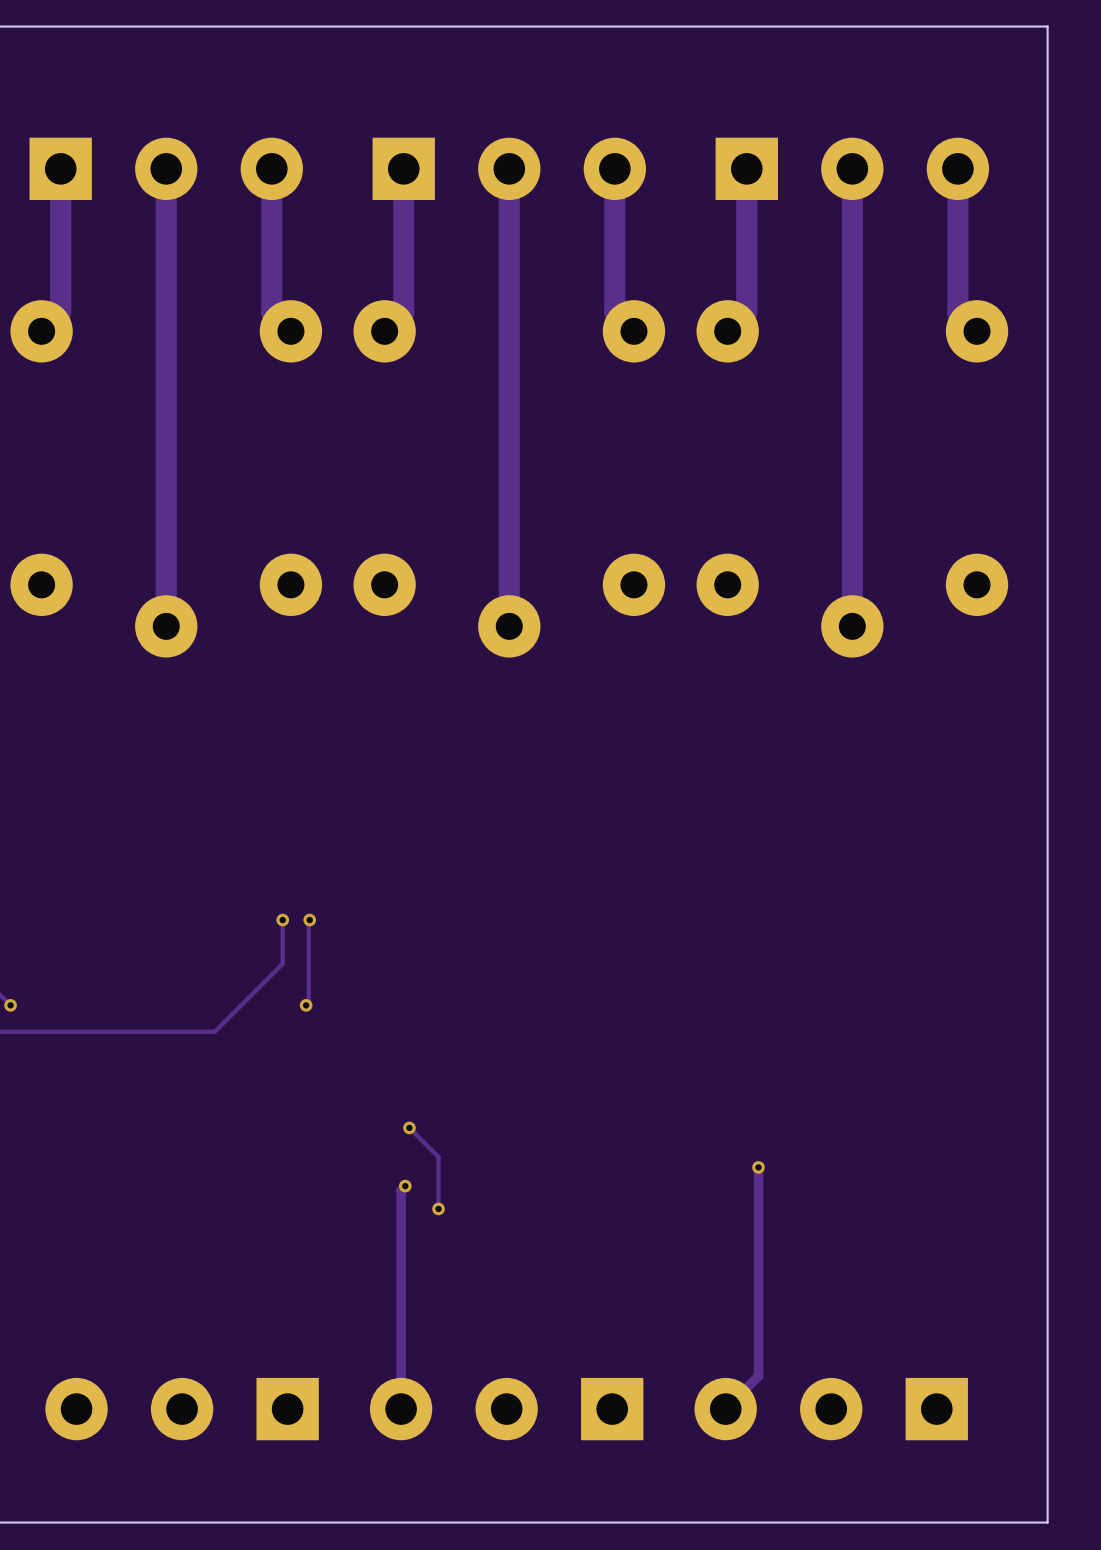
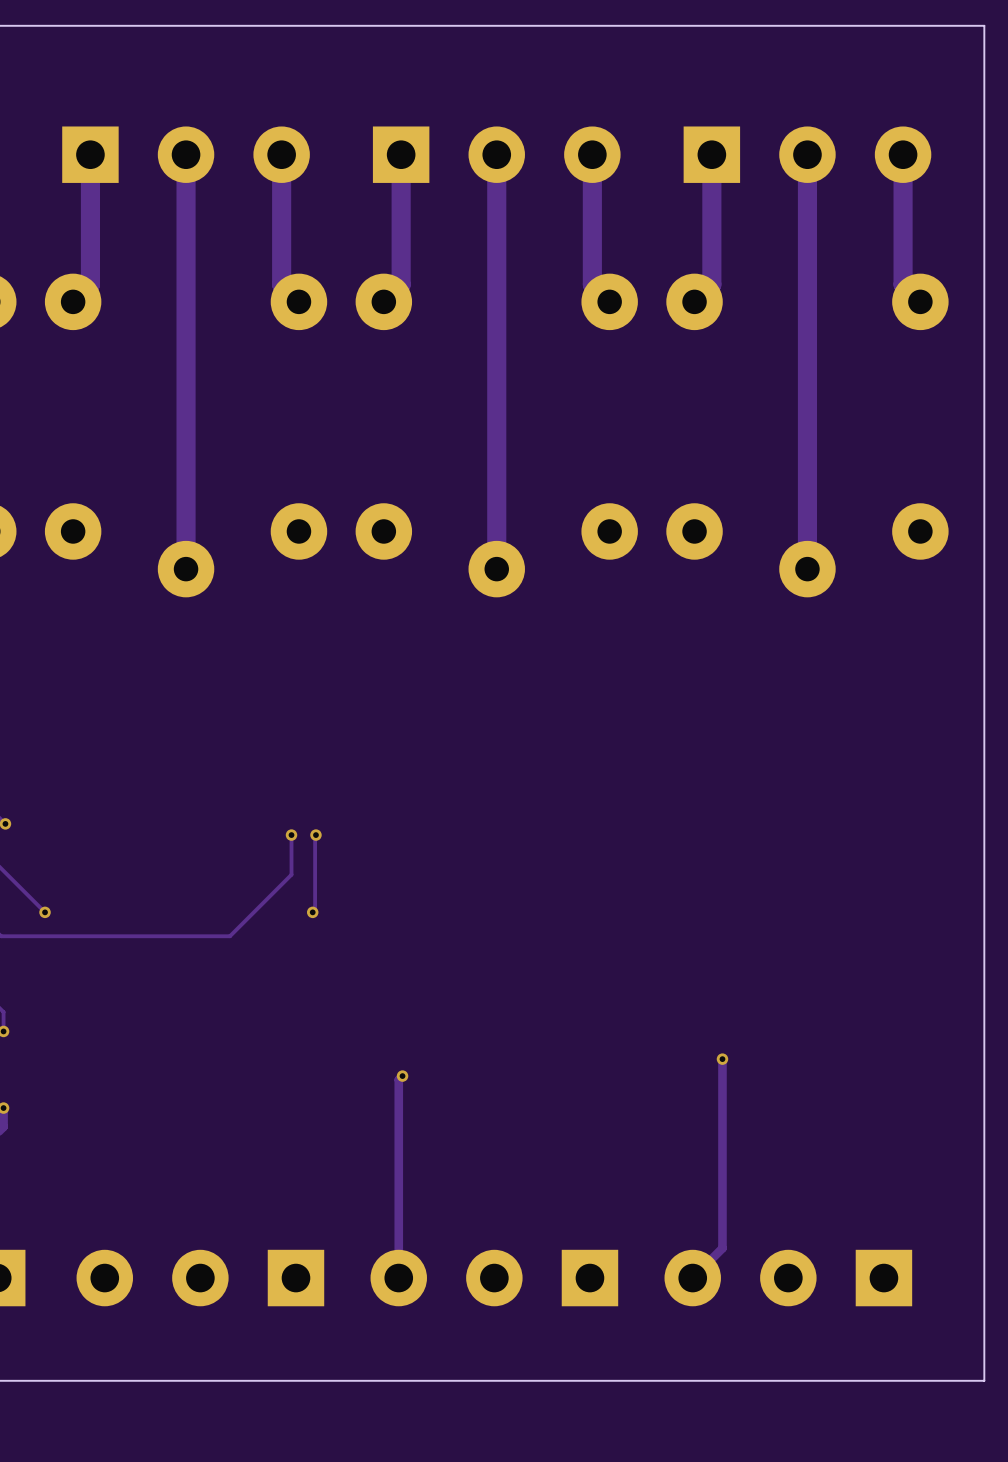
track: (409, 1127) (438, 1157) (438, 1208) -> none
via: (409, 1127) -> none
via: (438, 1208) -> none

